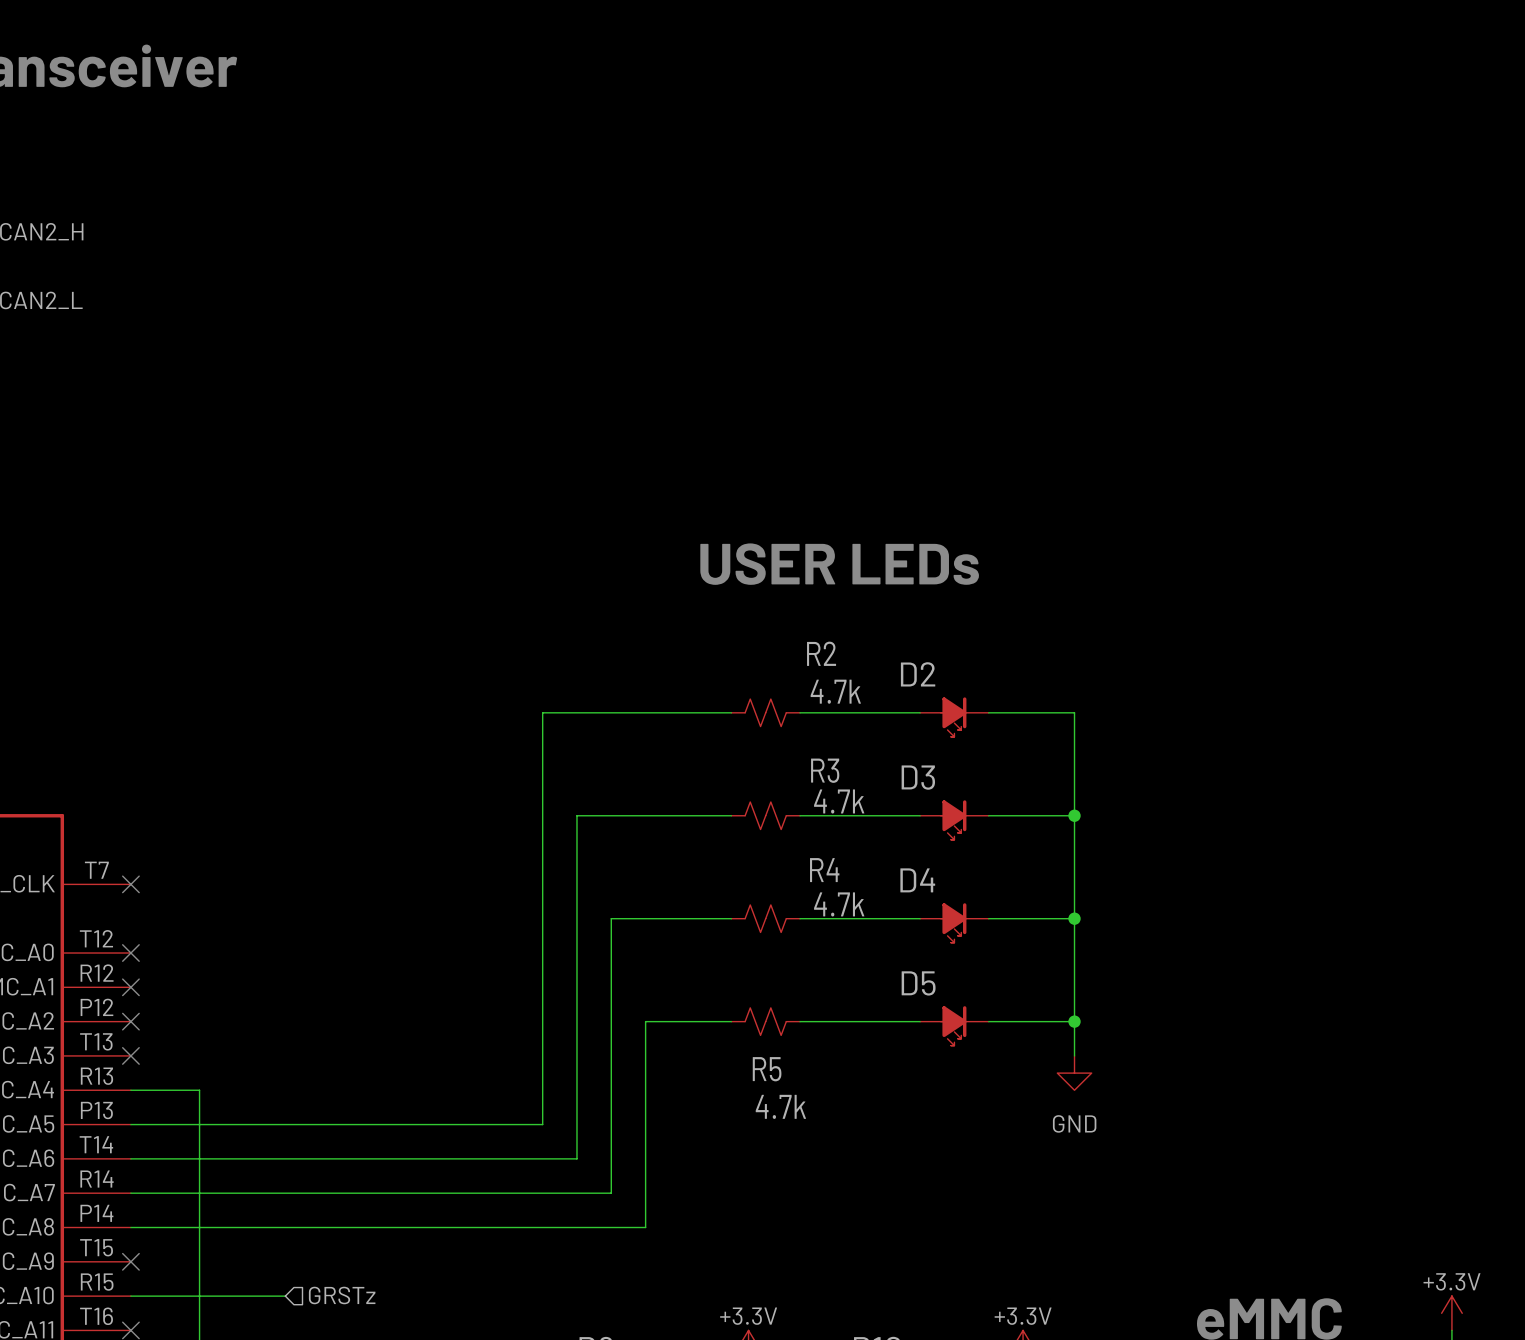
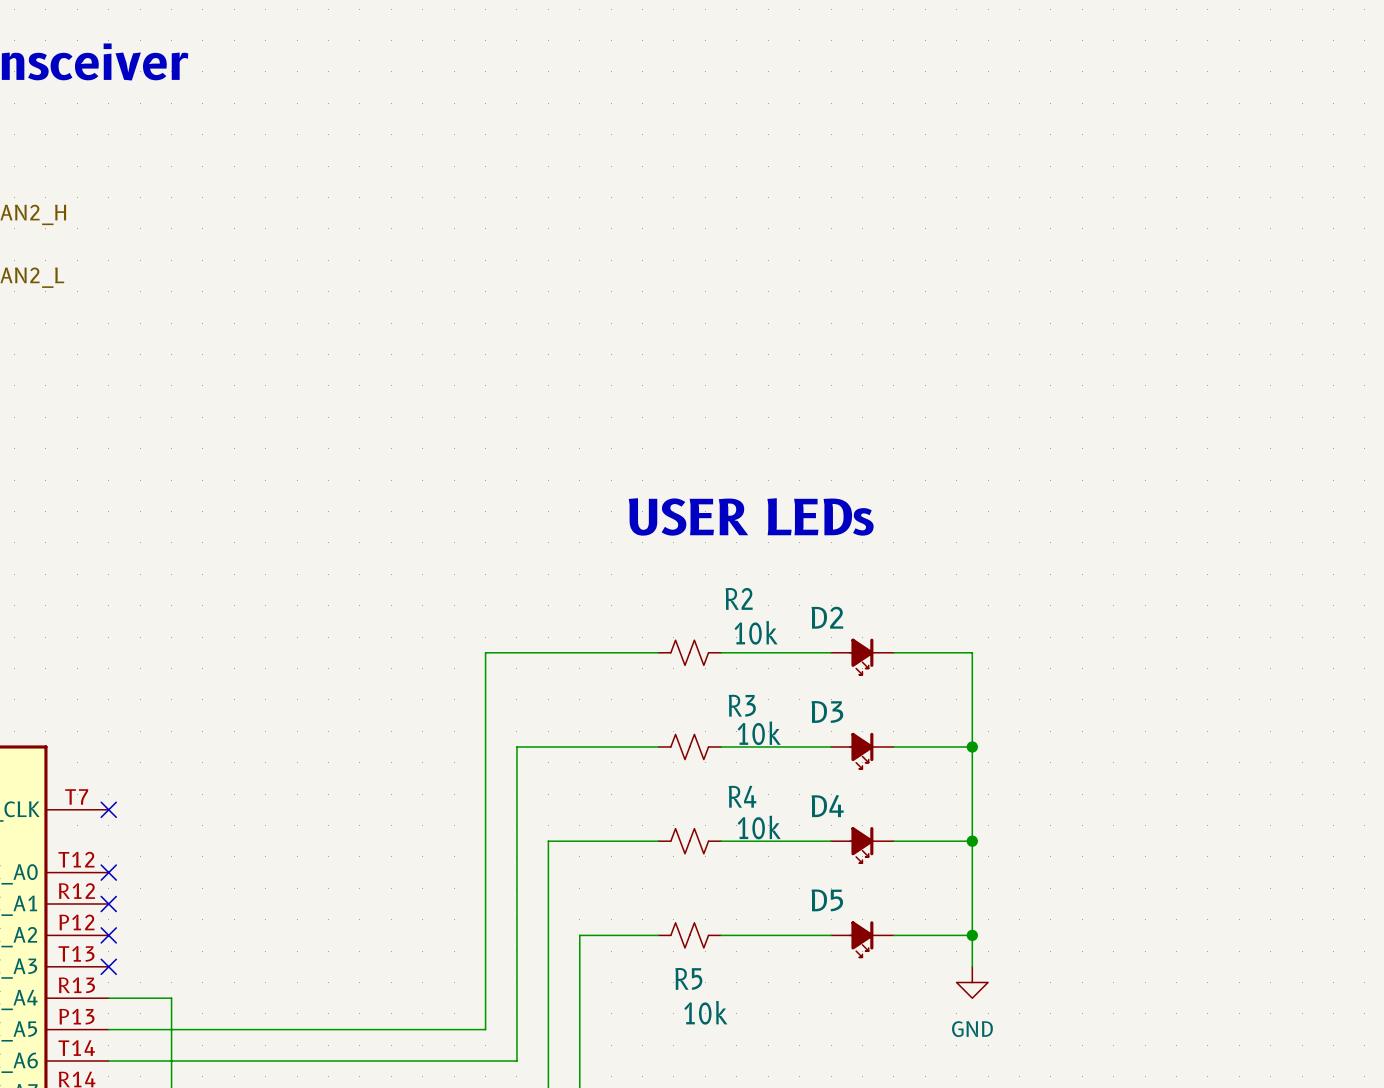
R2 value: 4.7k (835, 691) -> 10k (756, 632)
R3 value: 4.7k (839, 801) -> 10k (759, 733)
R4 value: 4.7k (839, 904) -> 10k (759, 827)
R5 value: 4.7k (780, 1106) -> 10k (705, 1012)

